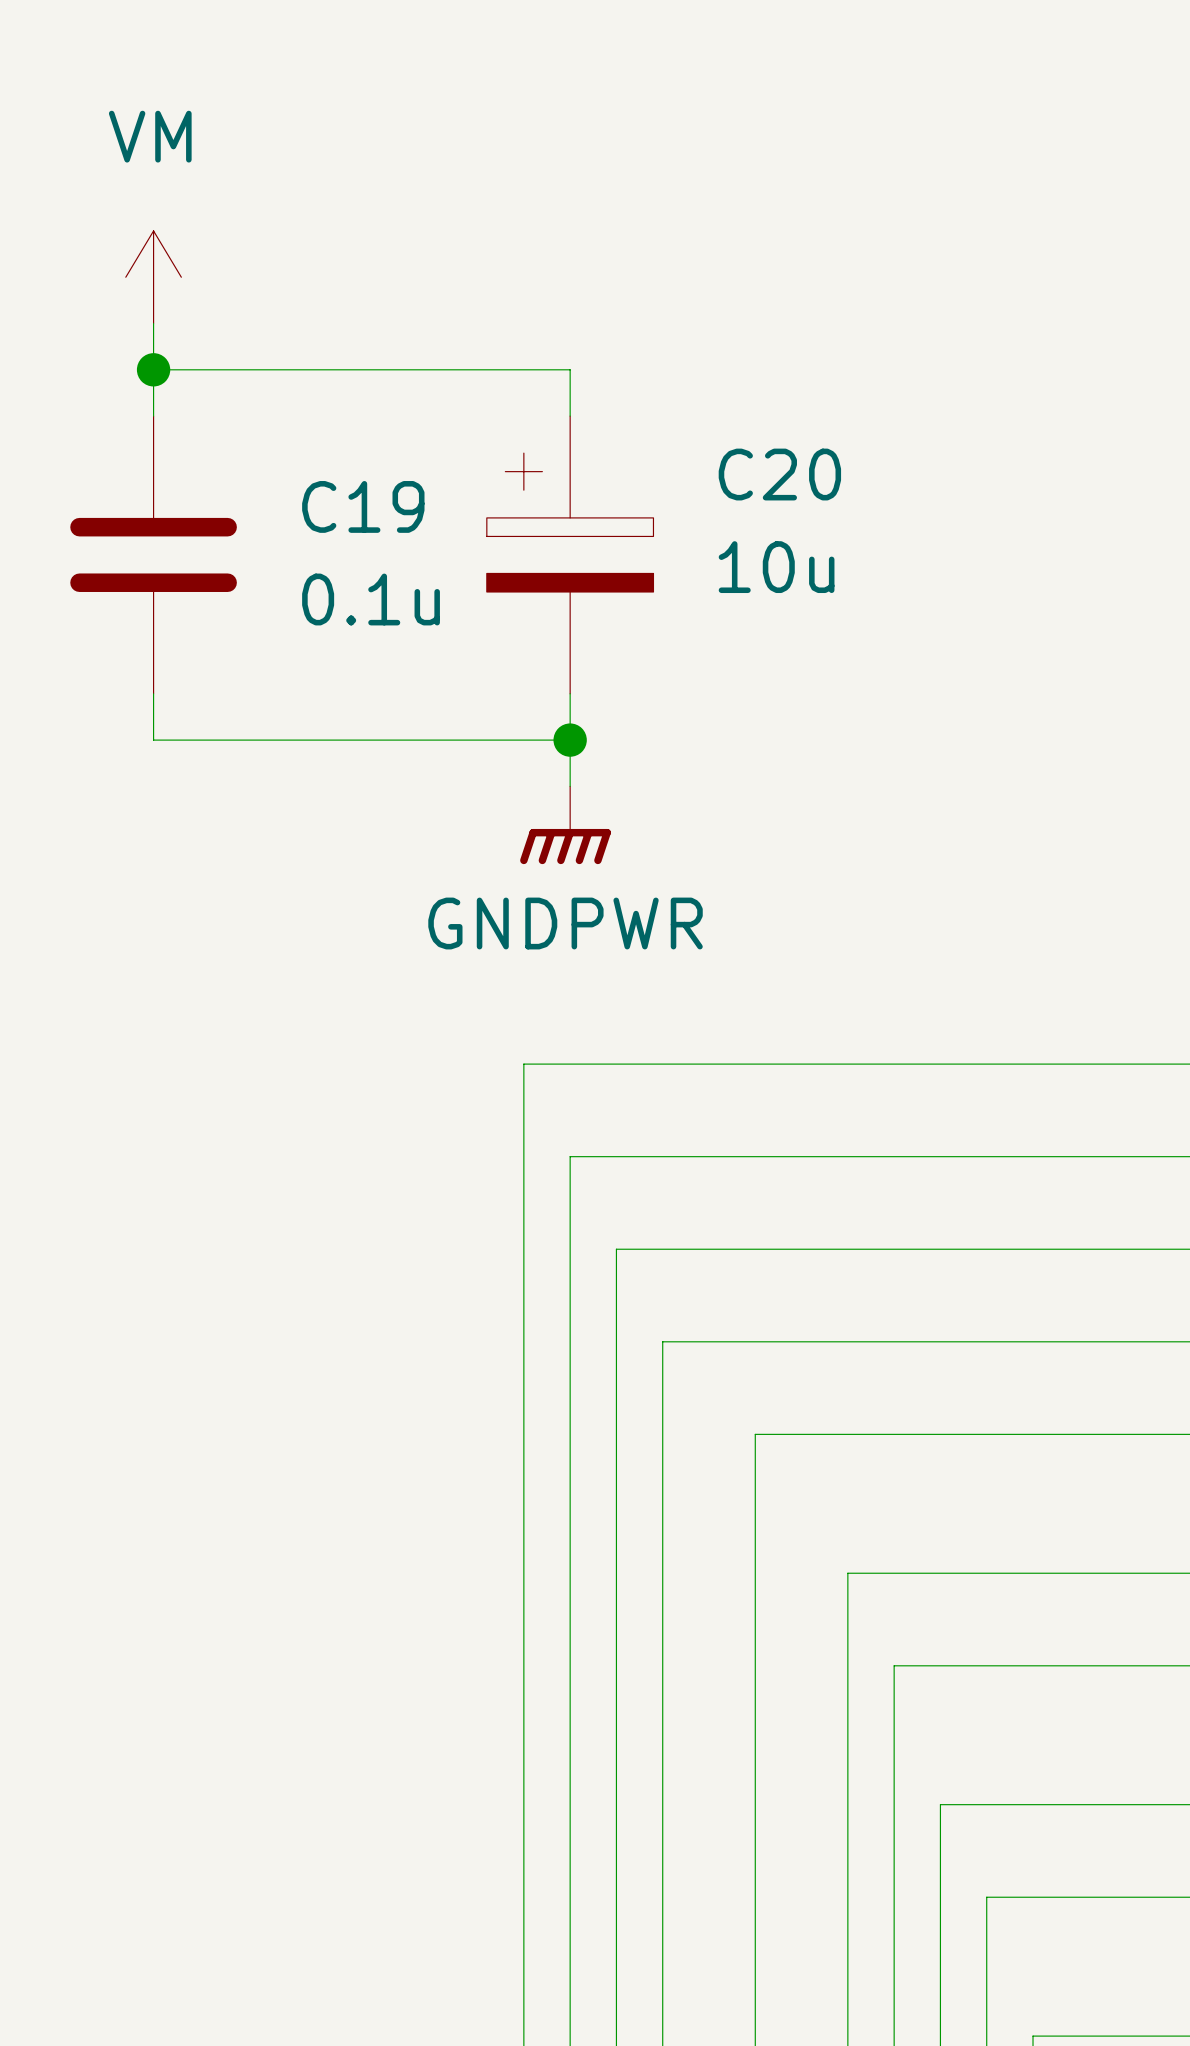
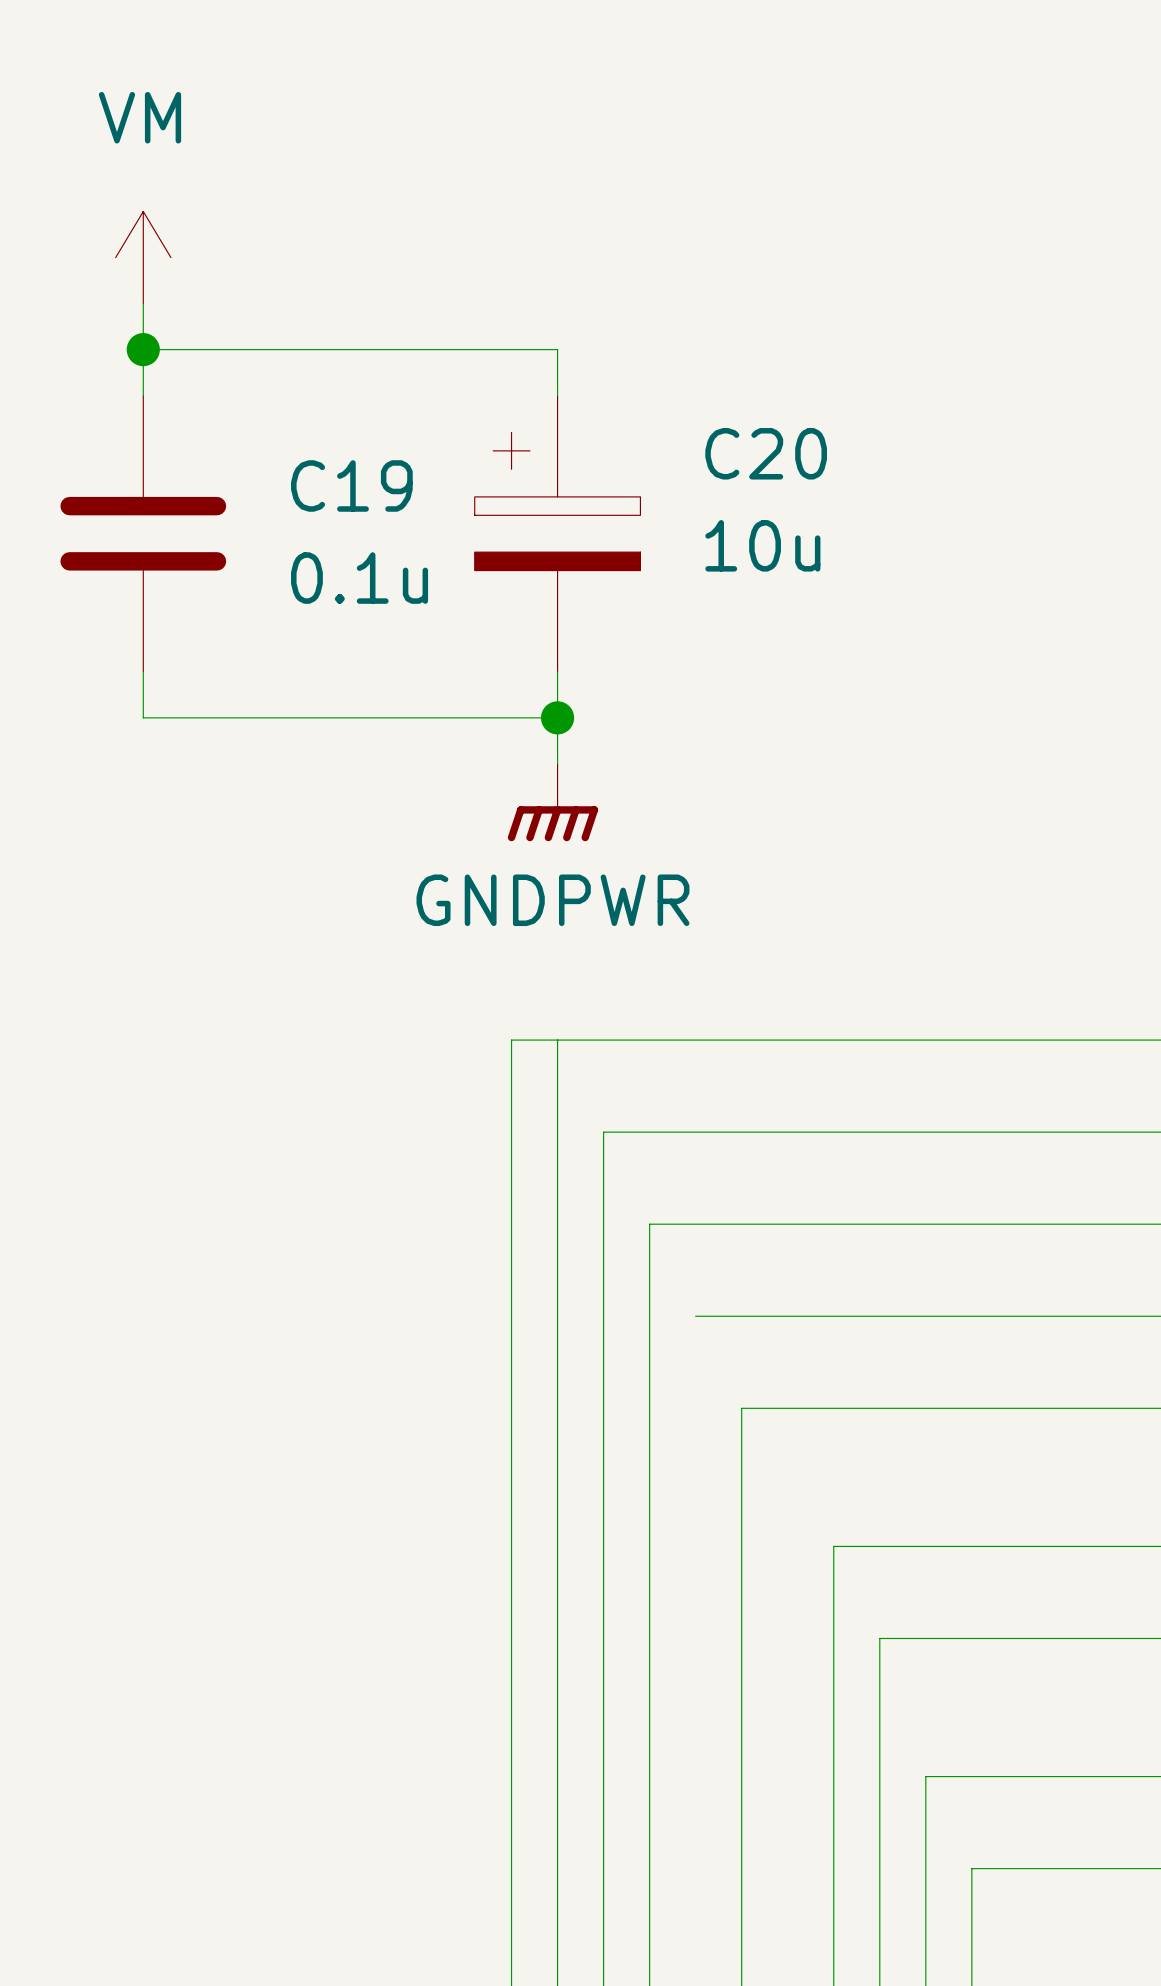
wire: (570, 1156) (616, 1156) -> (557, 1132) (557, 1040)
wire: (616, 1249) (662, 1249) -> (603, 1224) (603, 1132)
wire: (662, 1341) (709, 1341) -> (649, 1316) (649, 1224)

